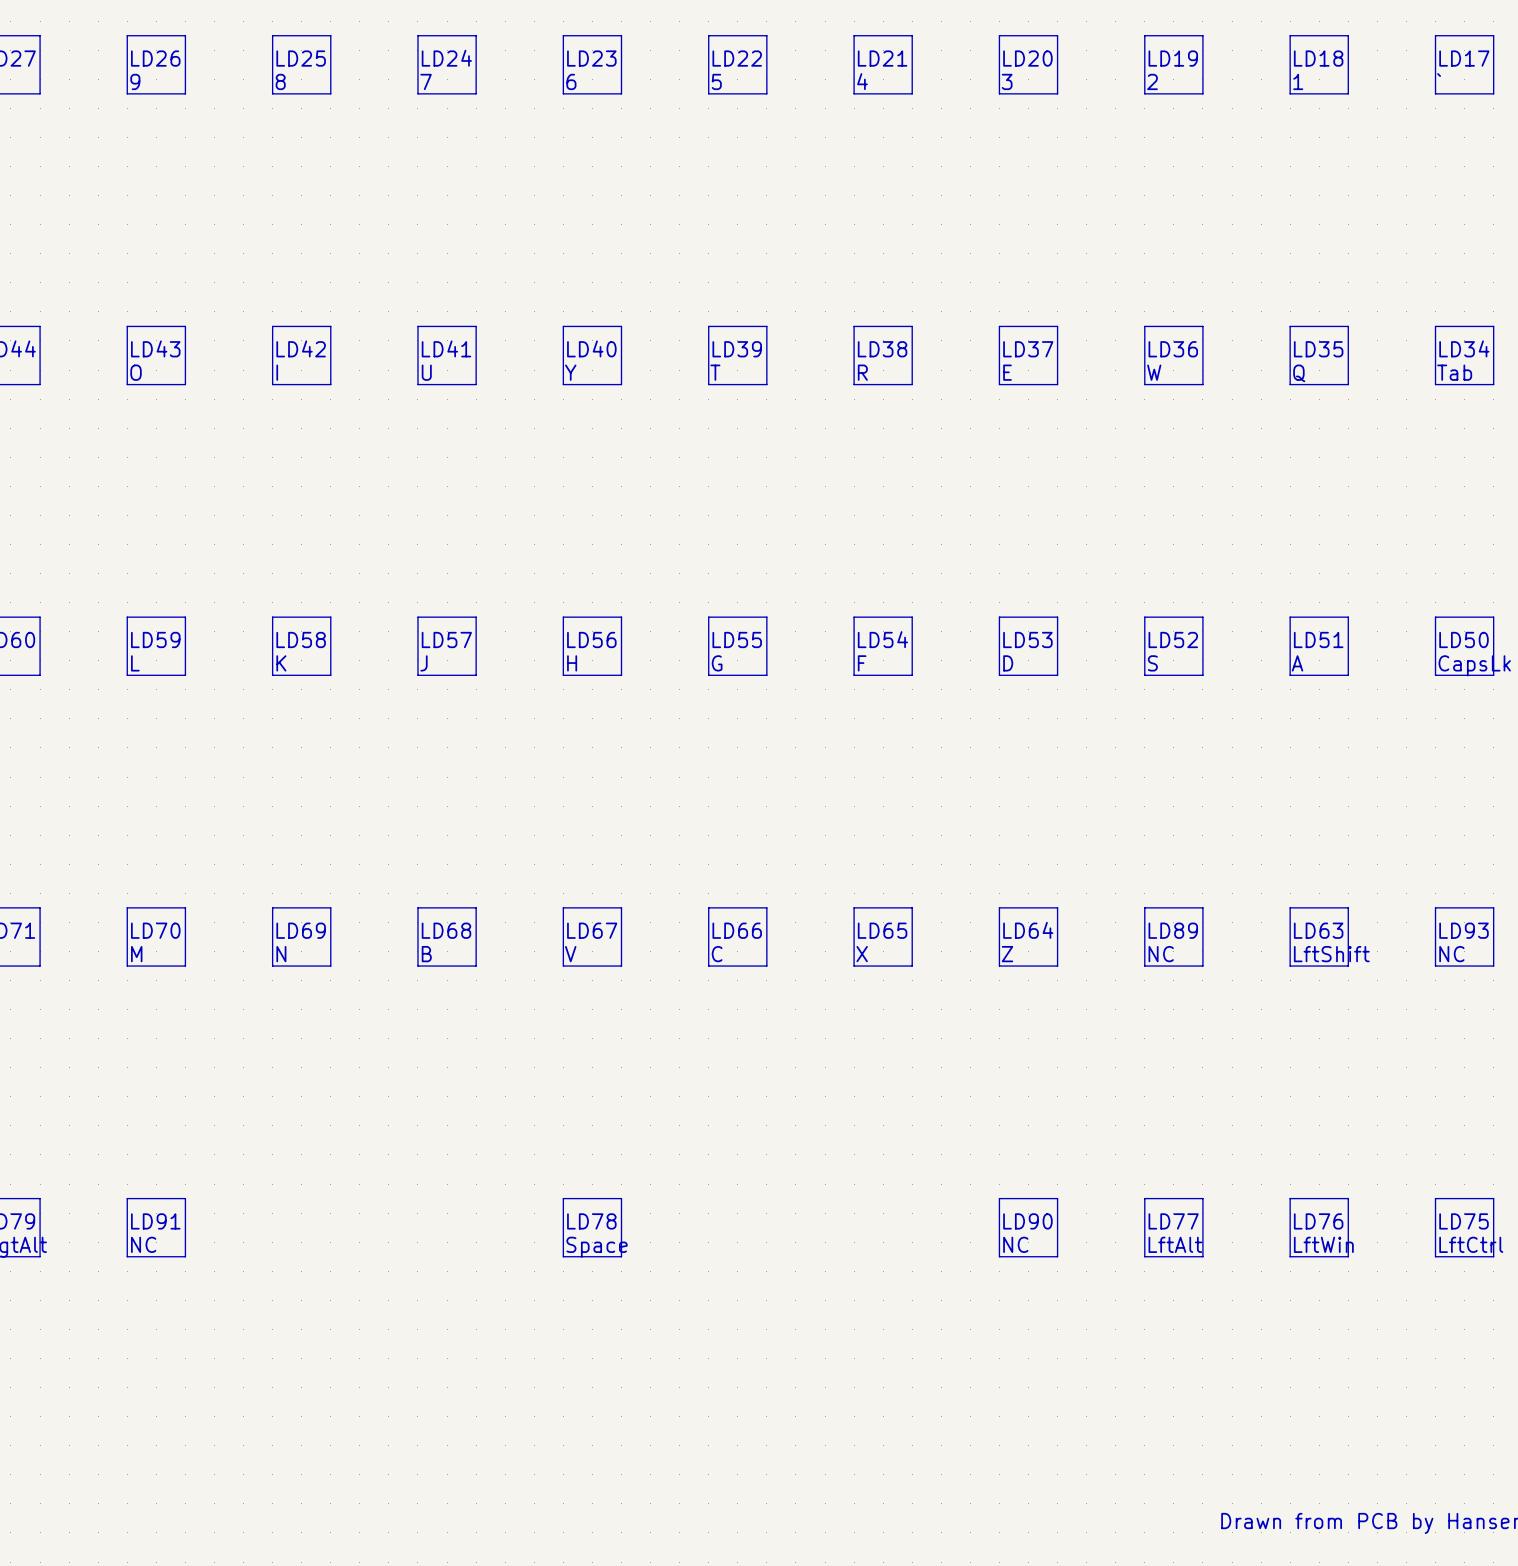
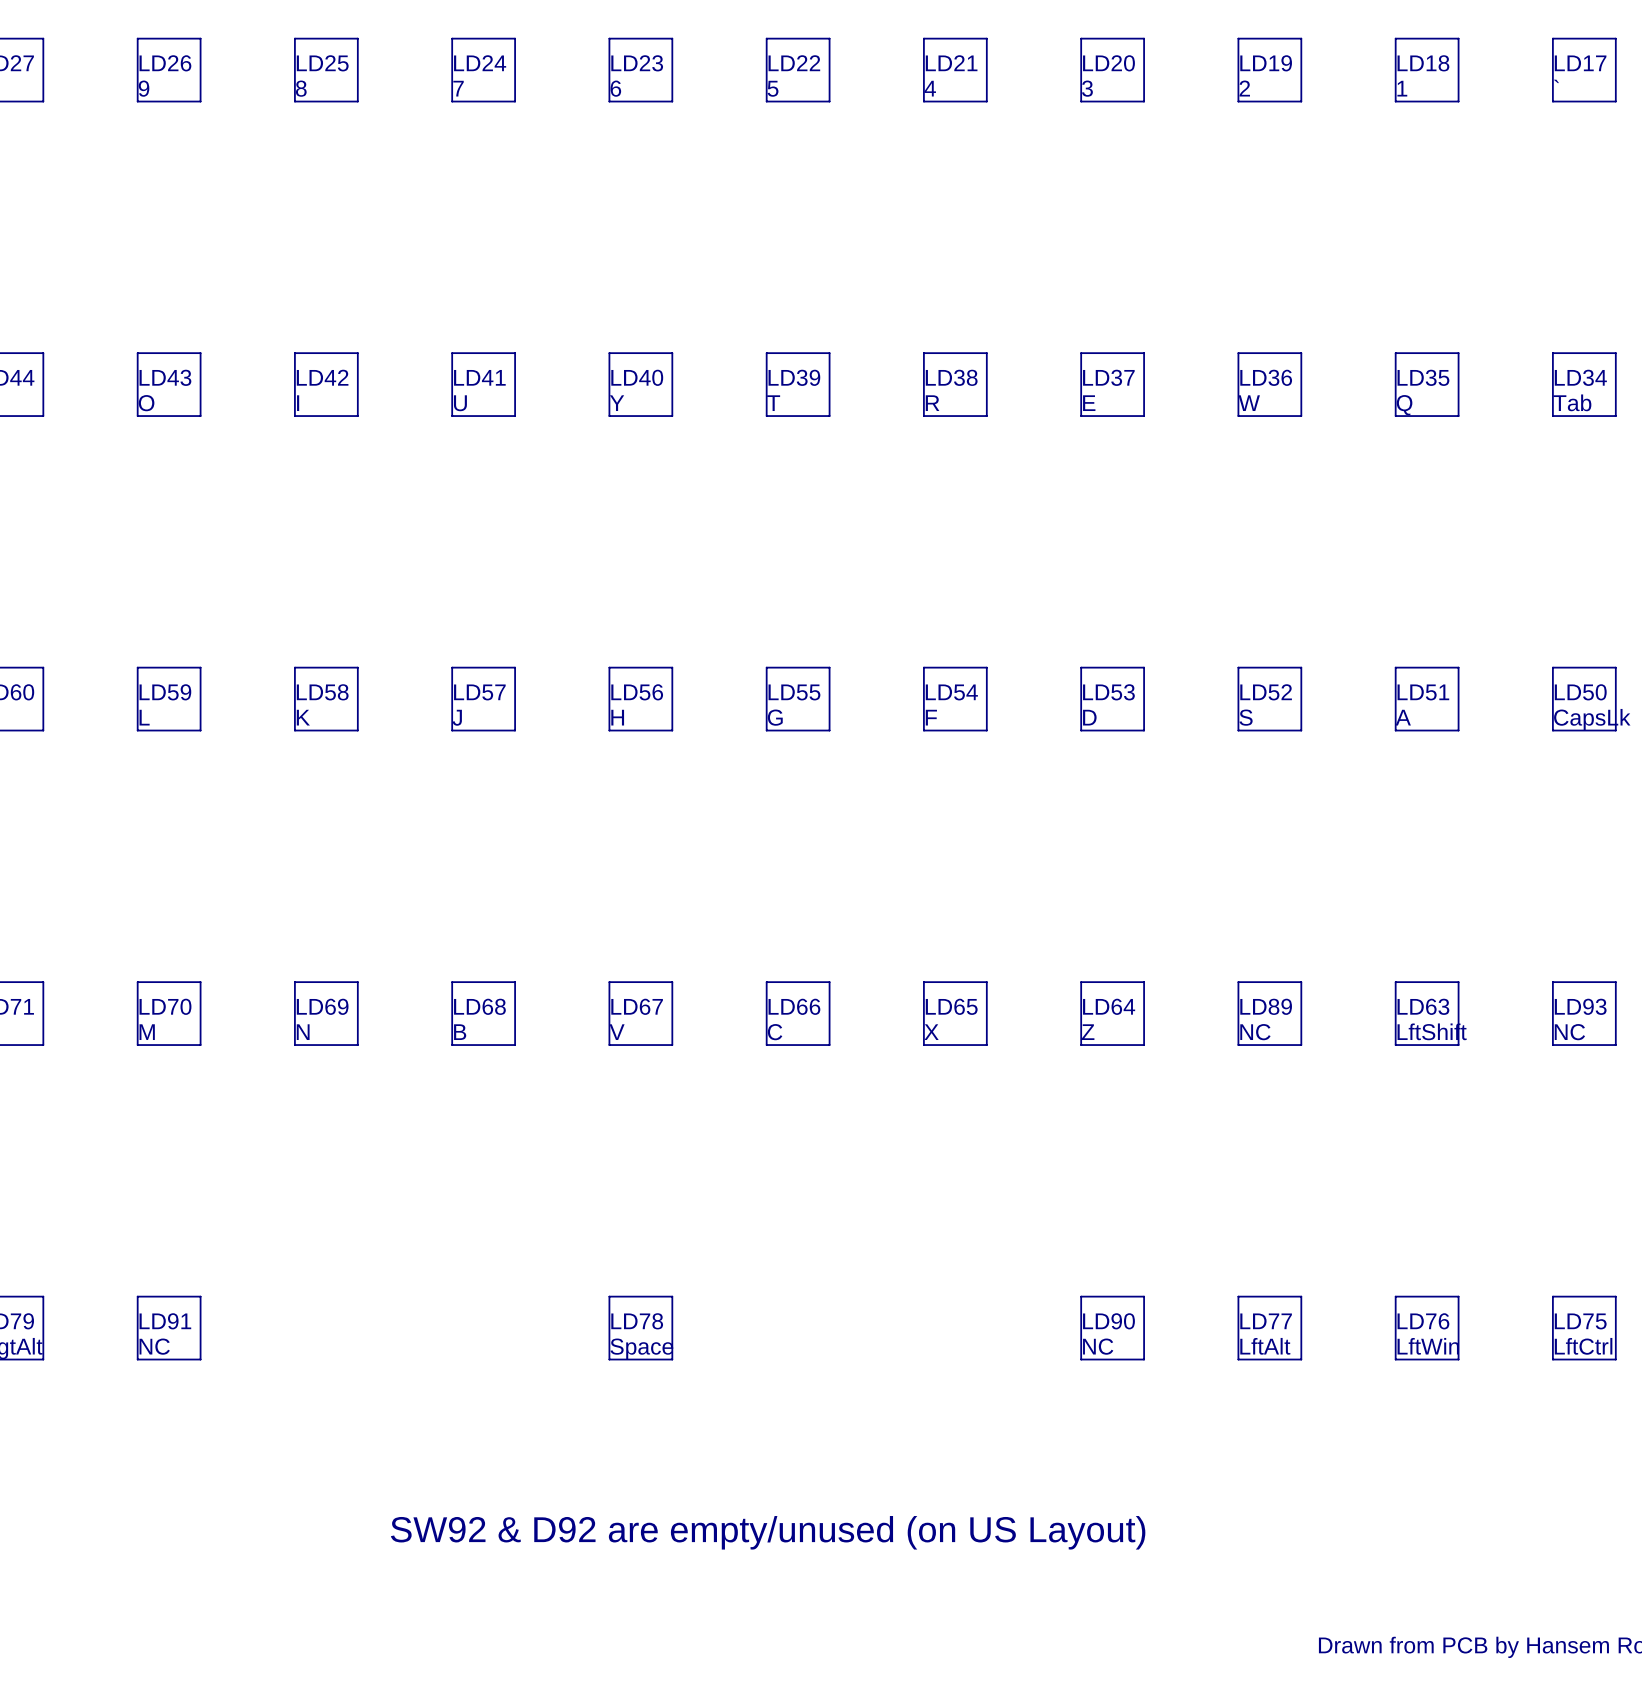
text: none -> SW92 & D92 are empty/unused (on US Layout) (768, 1532)

